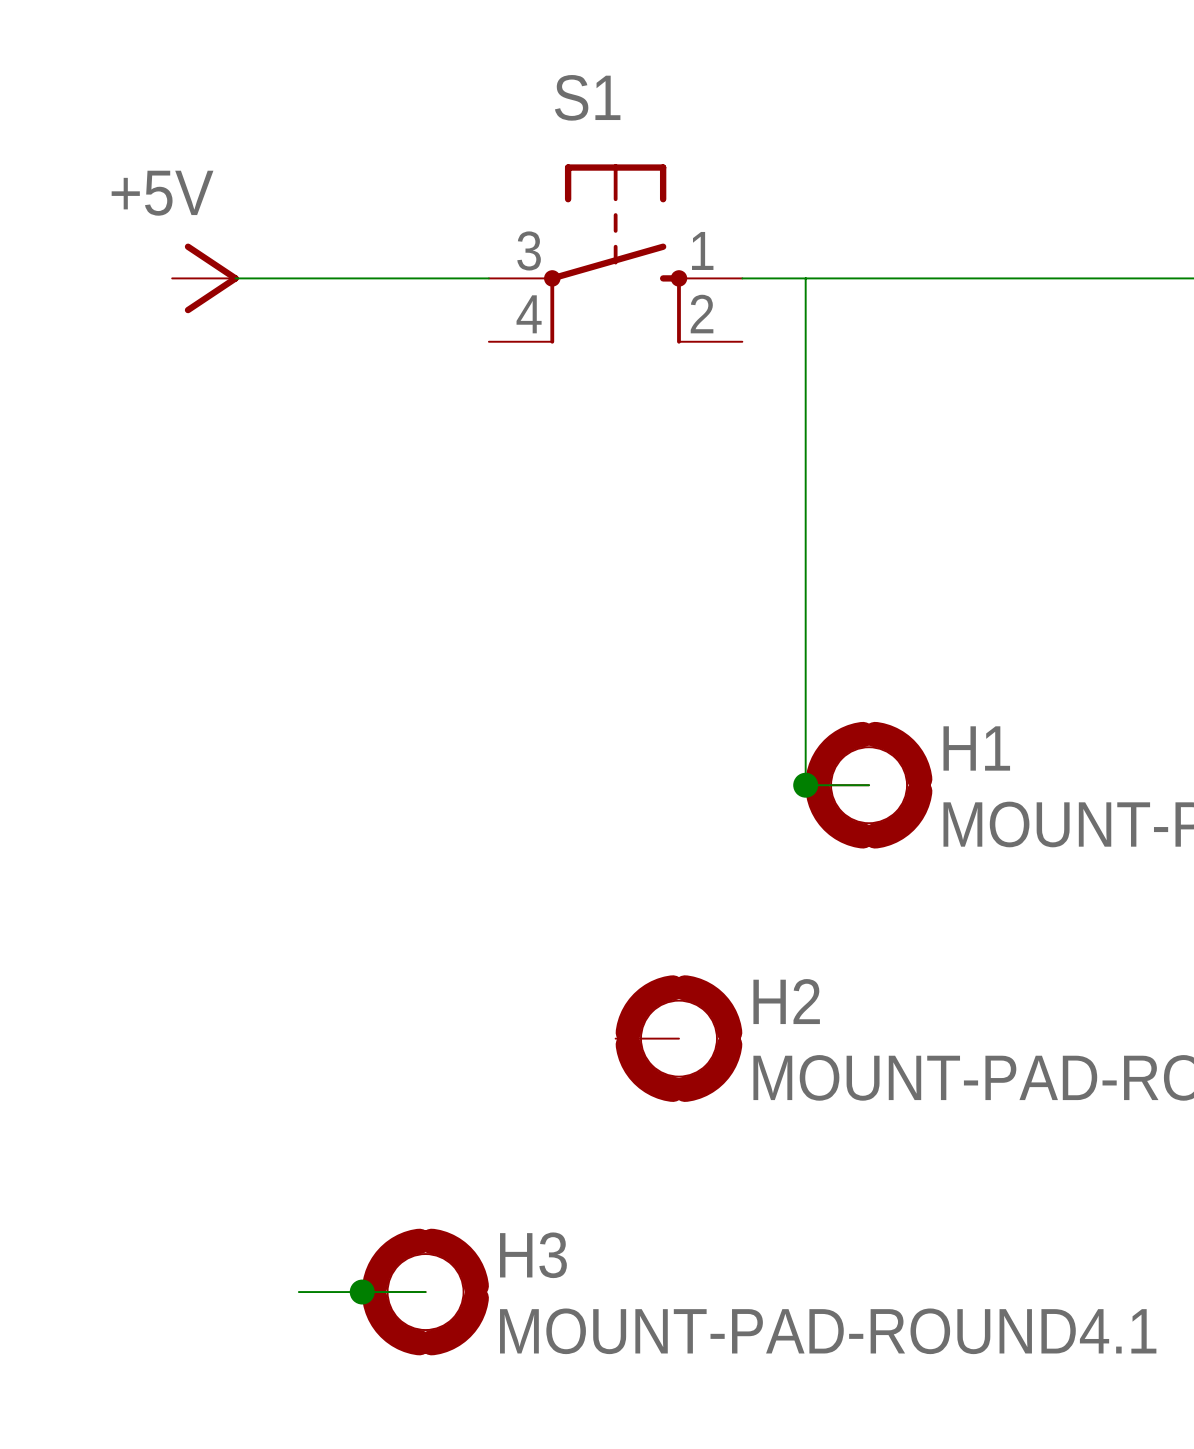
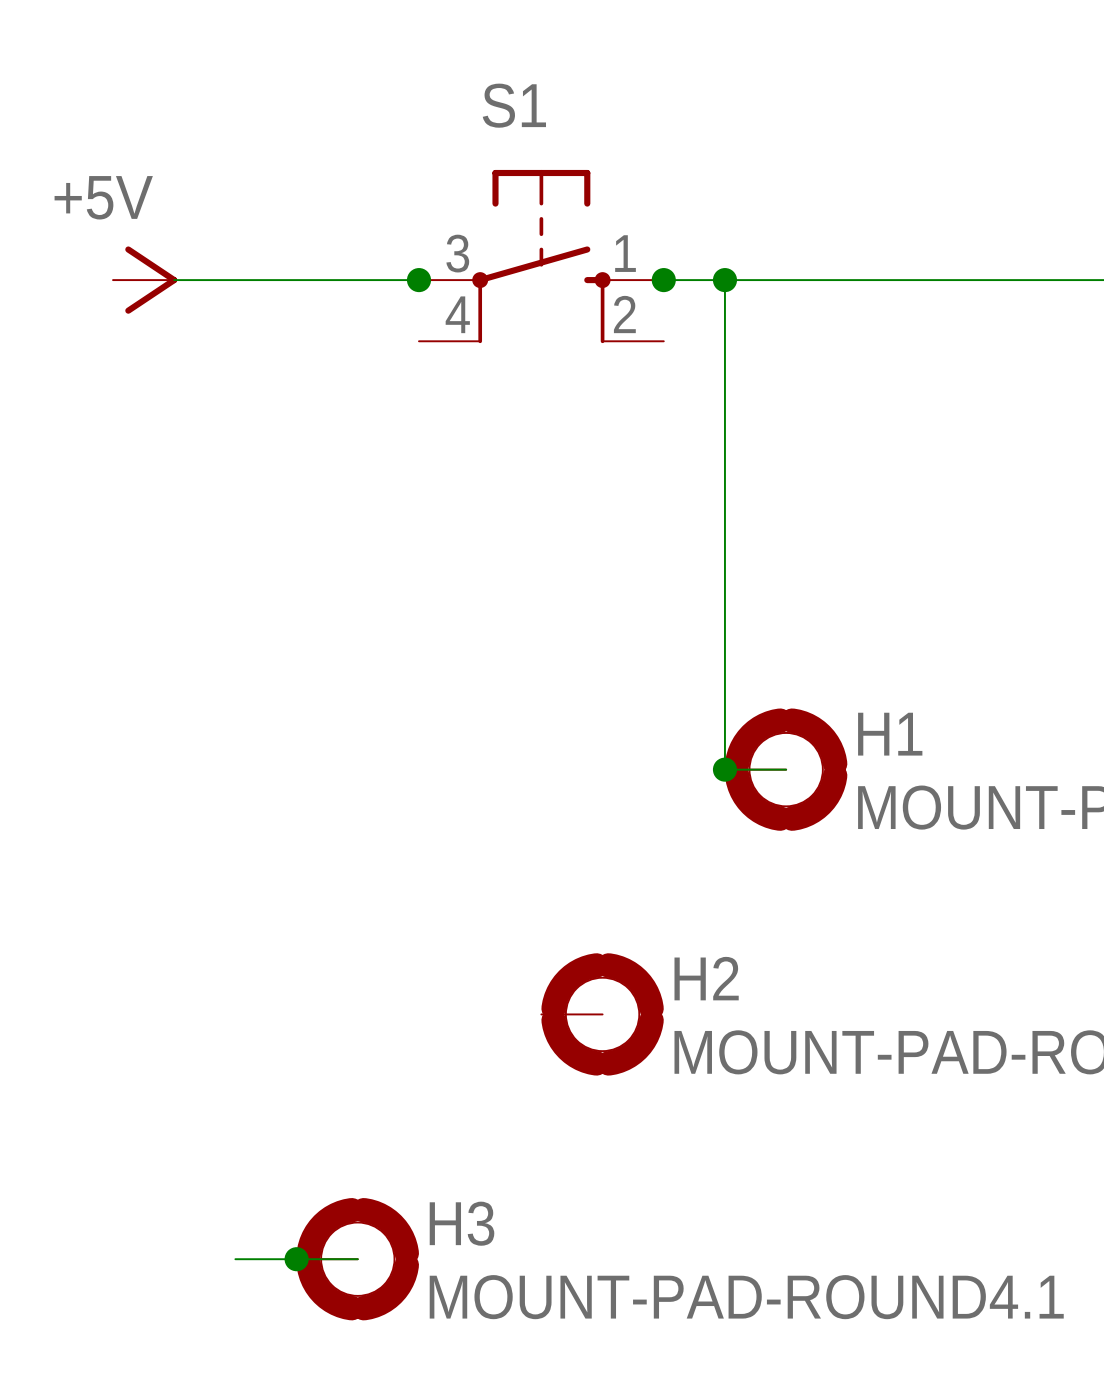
junction: none -> (419, 280)
junction: none -> (663, 280)
junction: none -> (724, 280)

